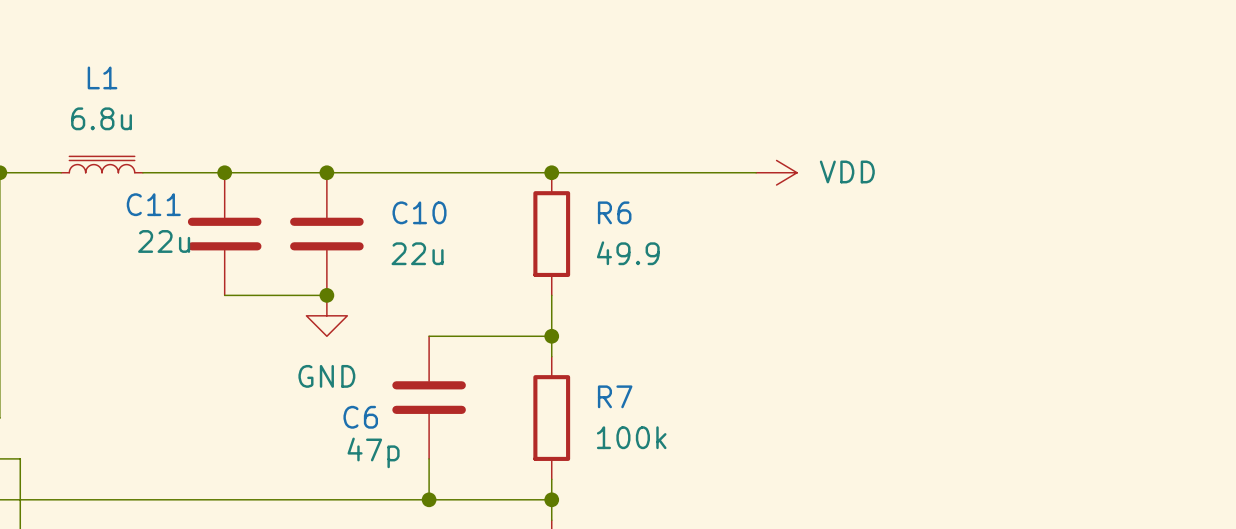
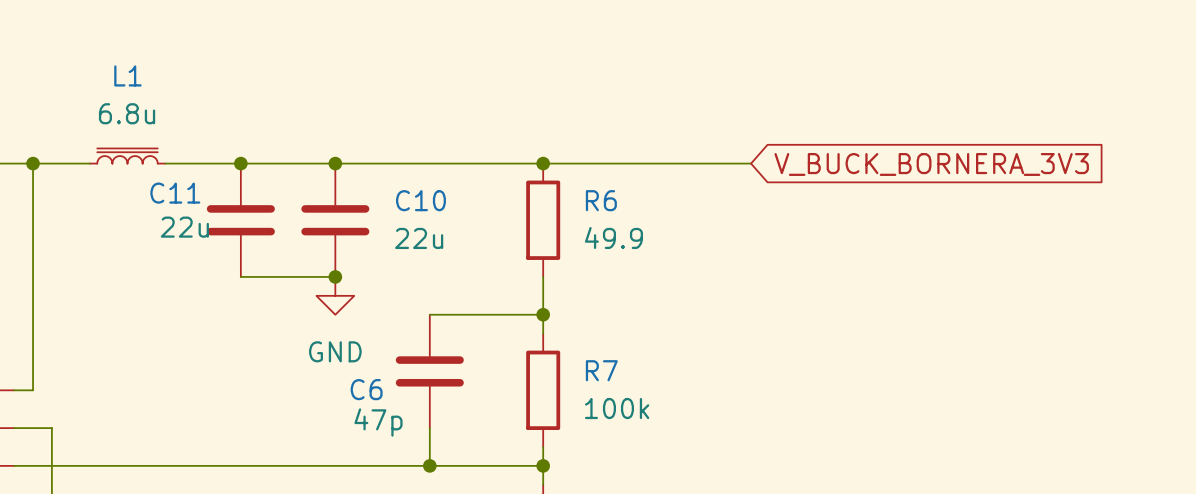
power symbol: VDD (776, 172) -> none
global label: none -> V_BUCK_BORNERA_3V3 (931, 164)

